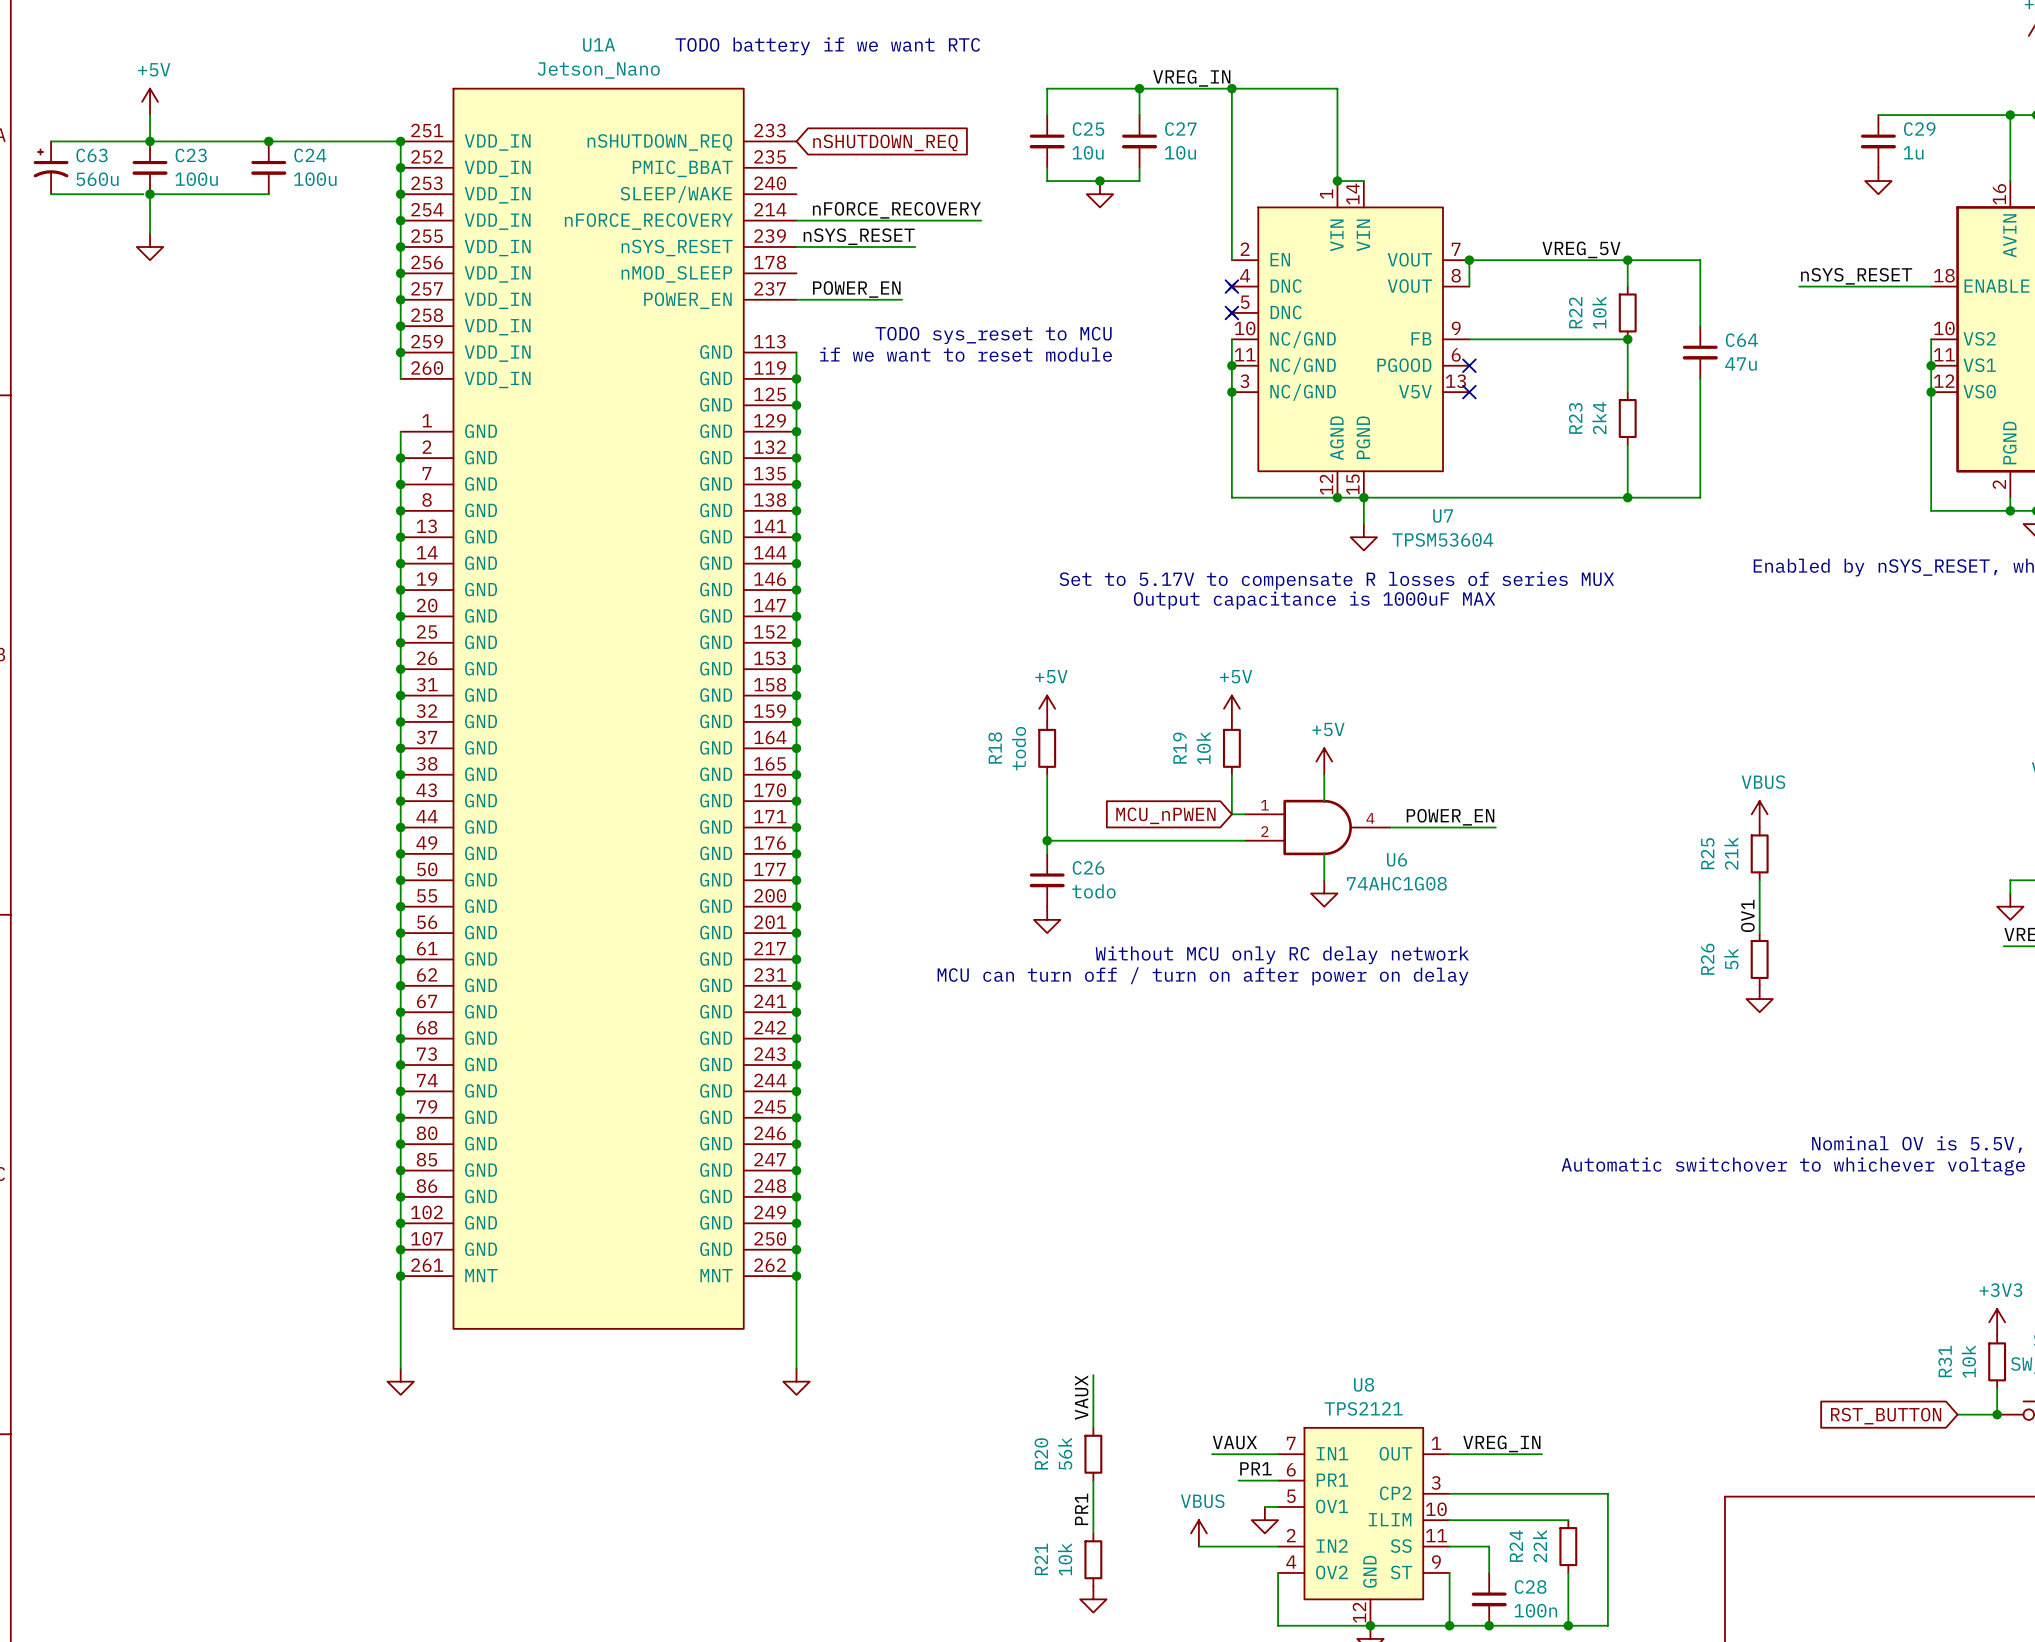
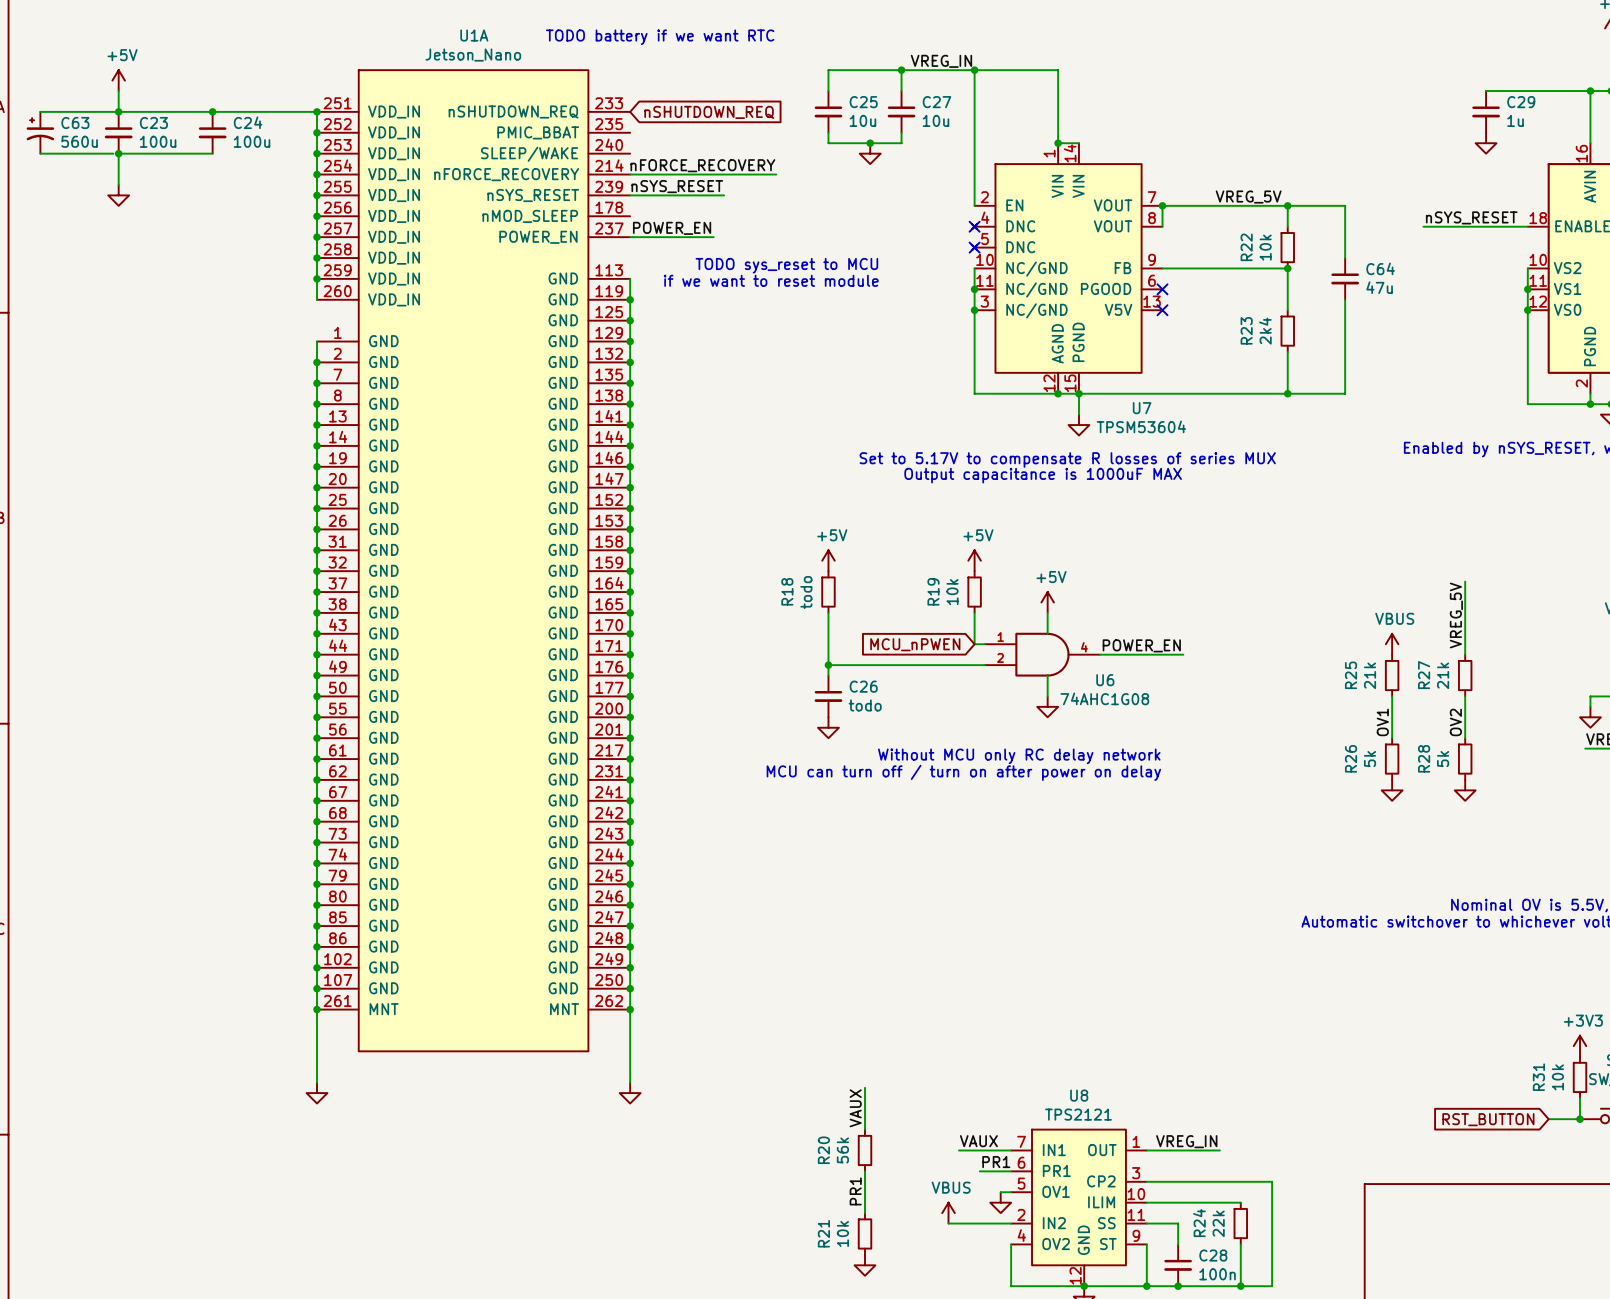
wire: none -> (1465, 581) (1465, 654)
label: none -> VREG_5V (1456, 615)
R27: none -> 21k (1465, 675)
wire: none -> (1465, 696) (1465, 738)
label: none -> OV2 (1455, 722)
R28: none -> 5k (1465, 759)
power symbol: none -> (1465, 790)

